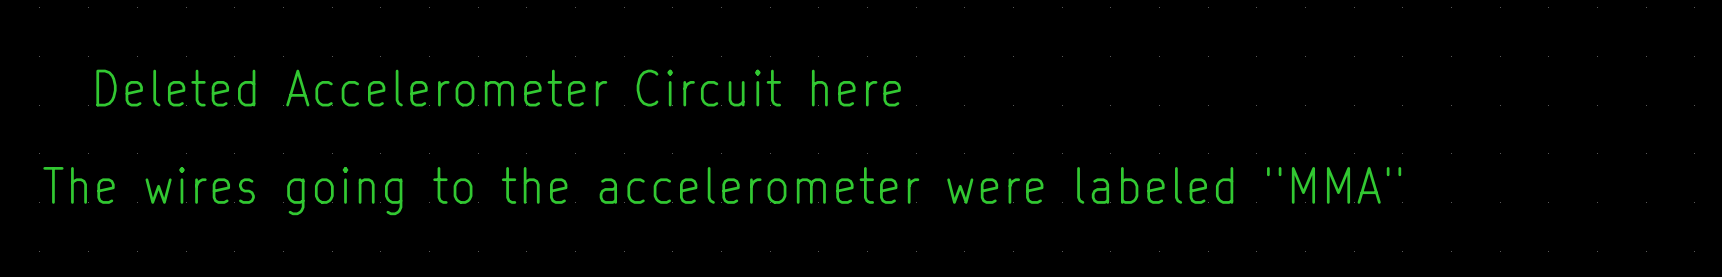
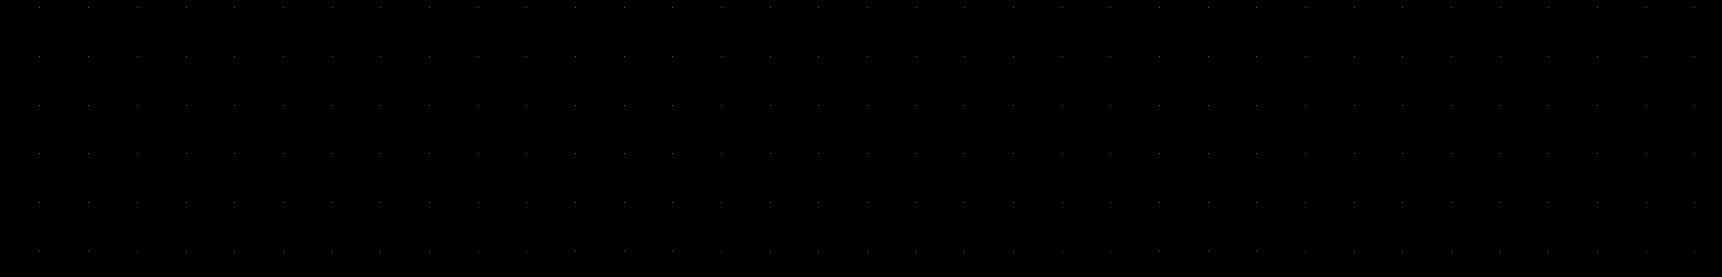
text: Deleted Accelerometer Circuit here (498, 88) -> none
text: The wires going to the accelerometer were labeled "MMA" (722, 191) -> none

